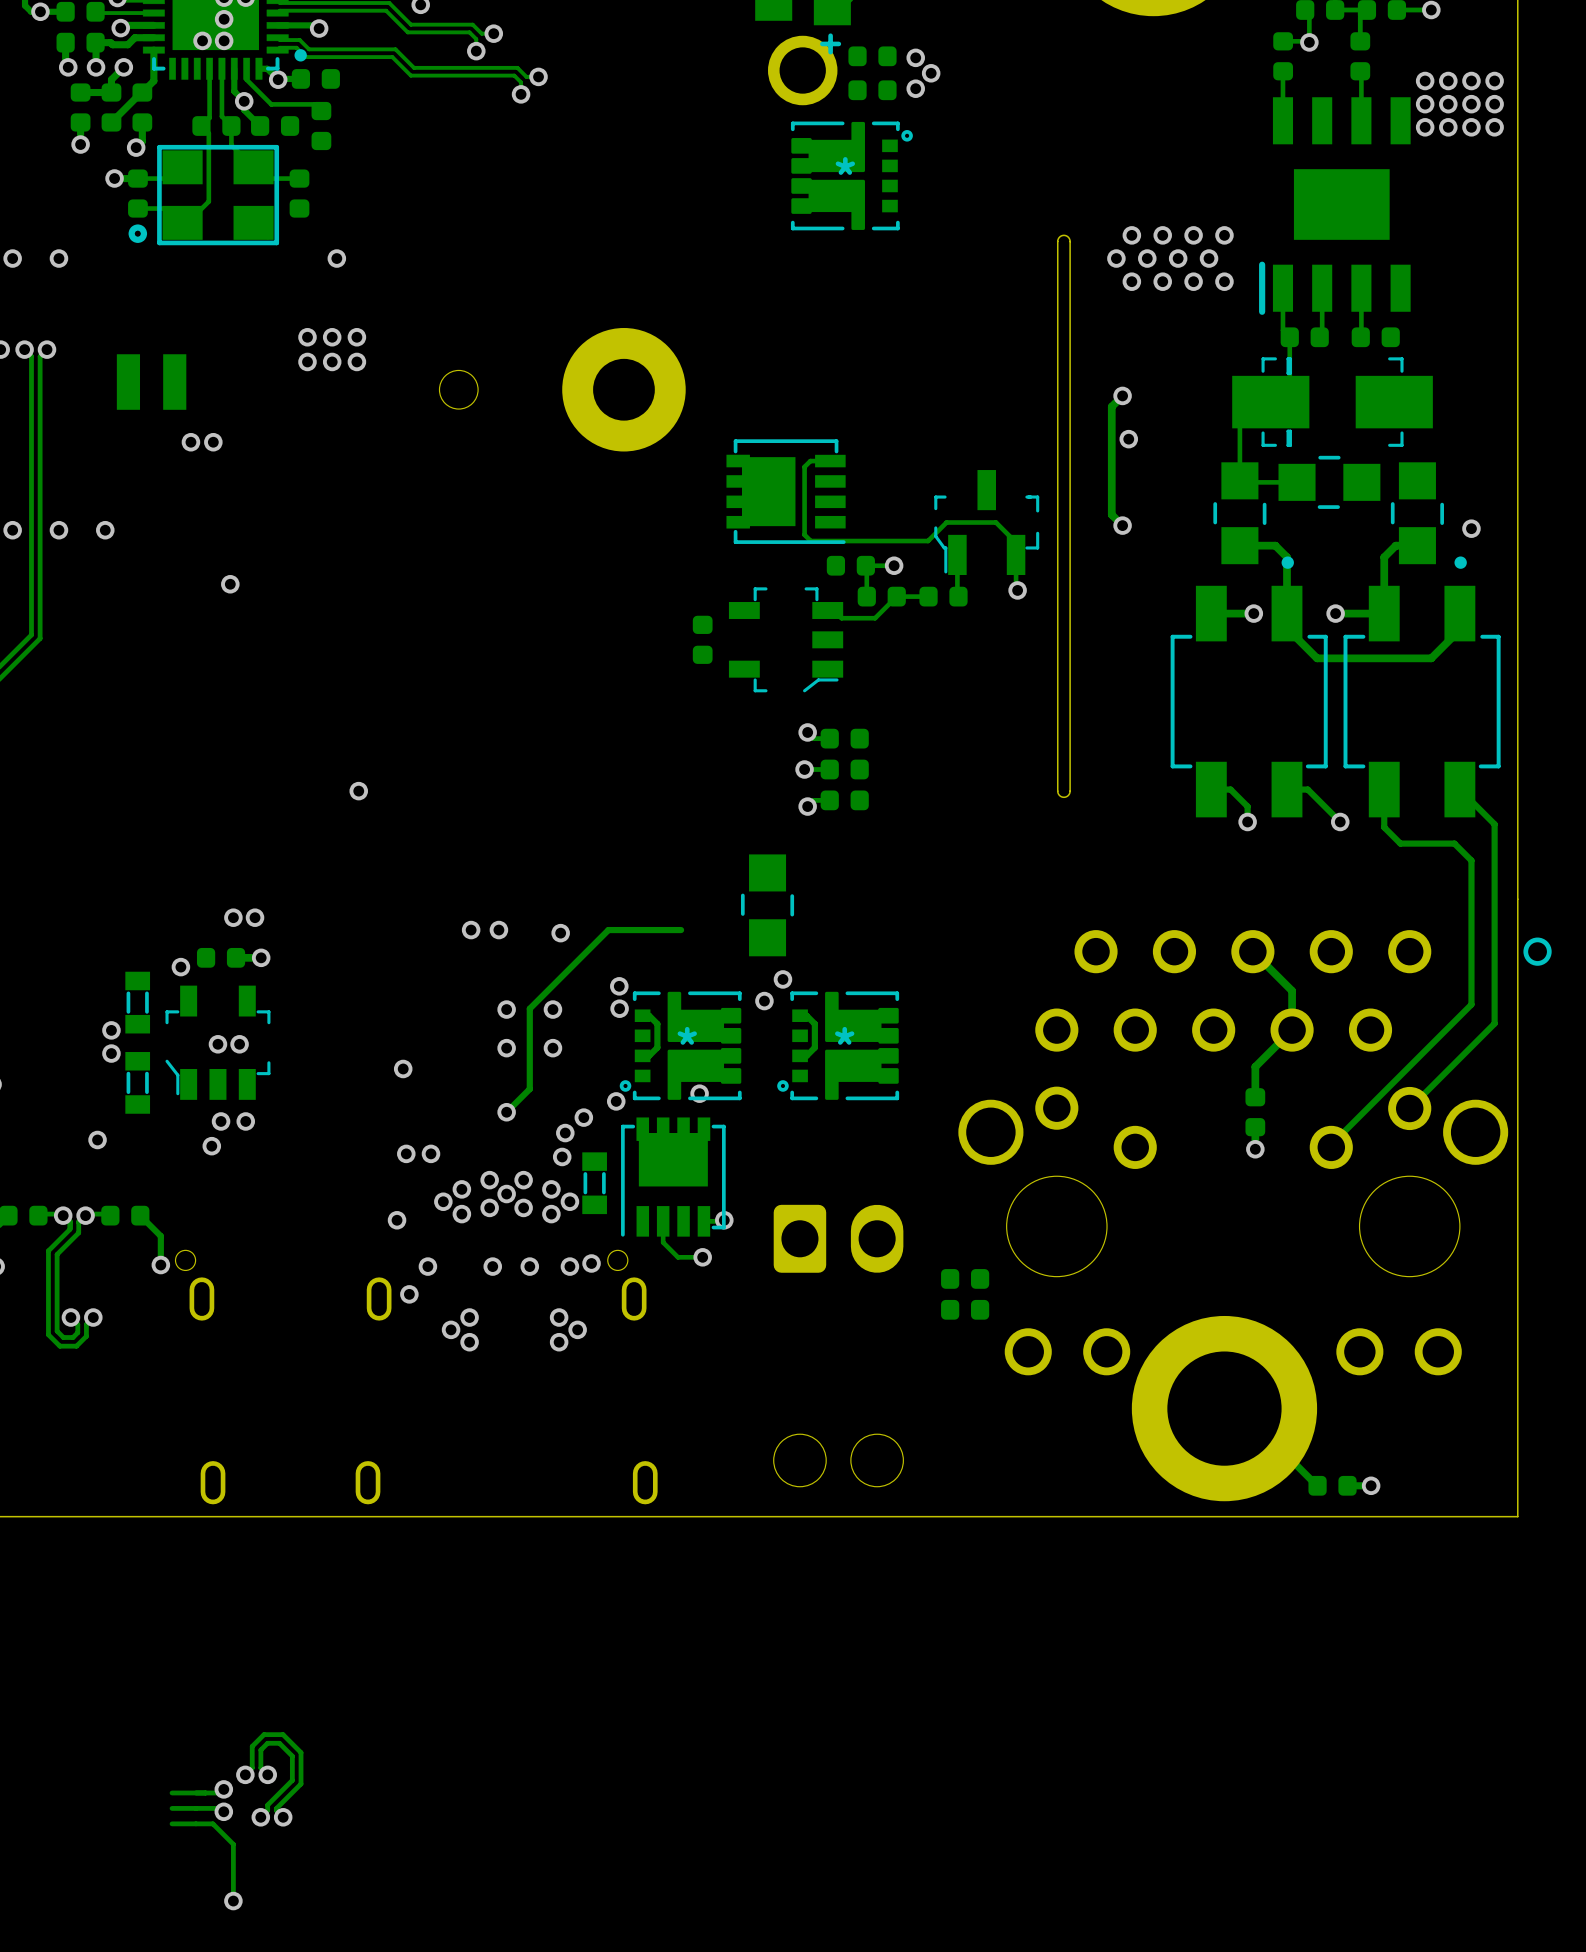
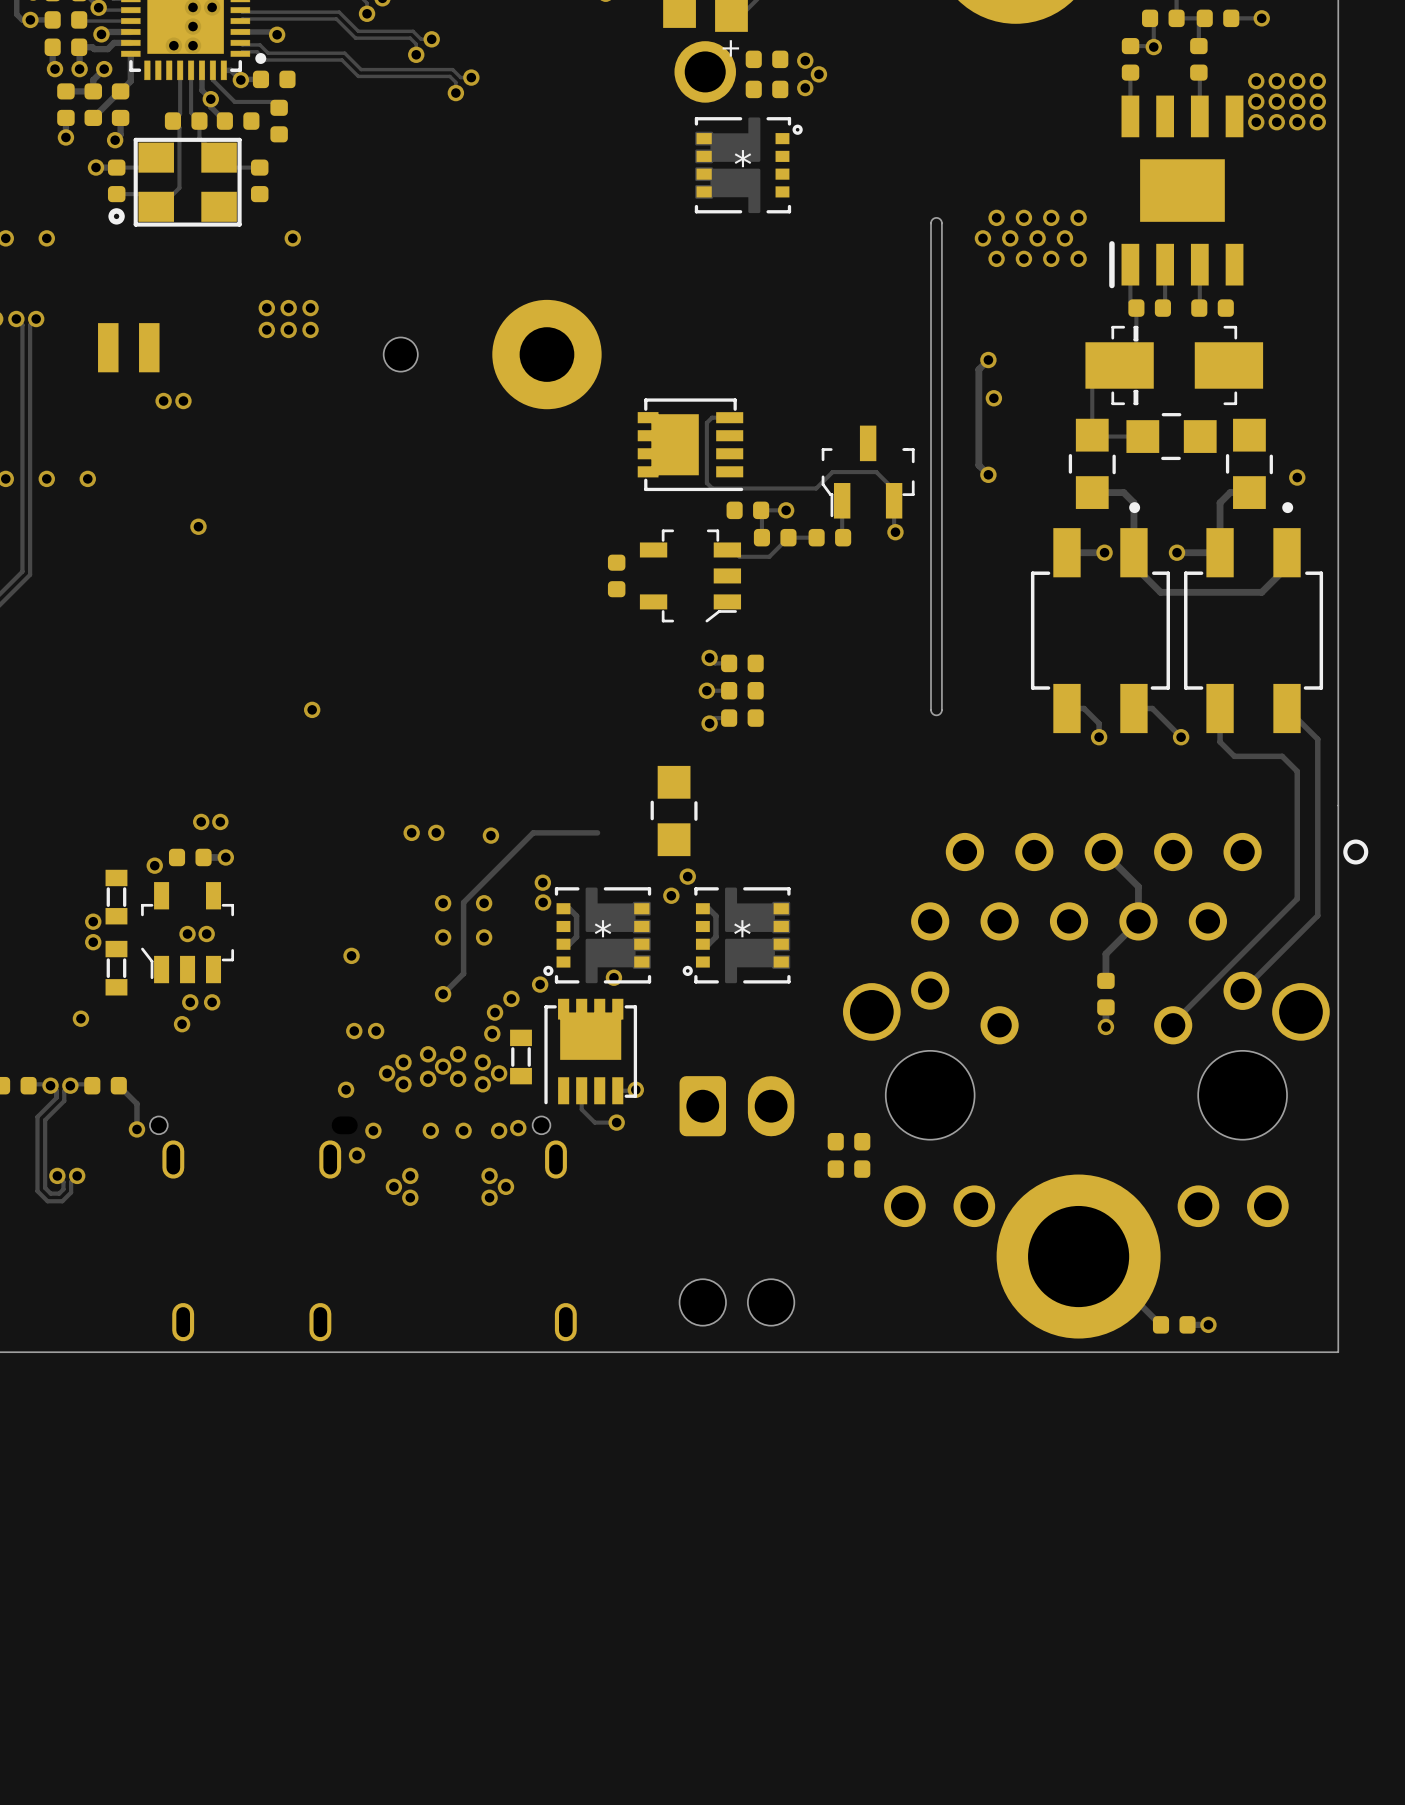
track: (245, 1774) (252, 1767) (252, 1746) (264, 1734) (283, 1734) (301, 1752) (301, 1783) (276, 1808) (283, 1817) -> none
via: (245, 1774) -> none
track: (267, 1774) (260, 1767) (260, 1750) (267, 1743) (279, 1743) (292, 1756) (292, 1780) (267, 1805) (267, 1810) (260, 1817) -> none
via: (267, 1774) -> none
track: (223, 1789) (220, 1792) (172, 1792) -> none
via: (223, 1789) -> none
track: (172, 1808) (220, 1808) (223, 1811) -> none
via: (223, 1811) -> none
via: (260, 1817) -> none
via: (283, 1817) -> none
track: (172, 1823) (212, 1823) (233, 1844) (233, 1901) -> none
via: (233, 1901) -> none

